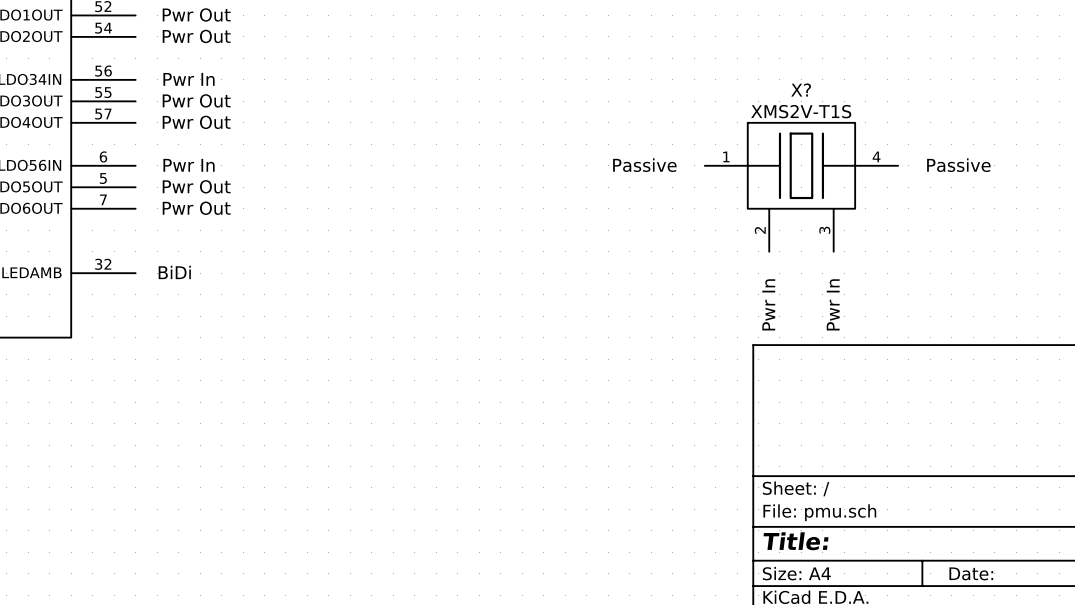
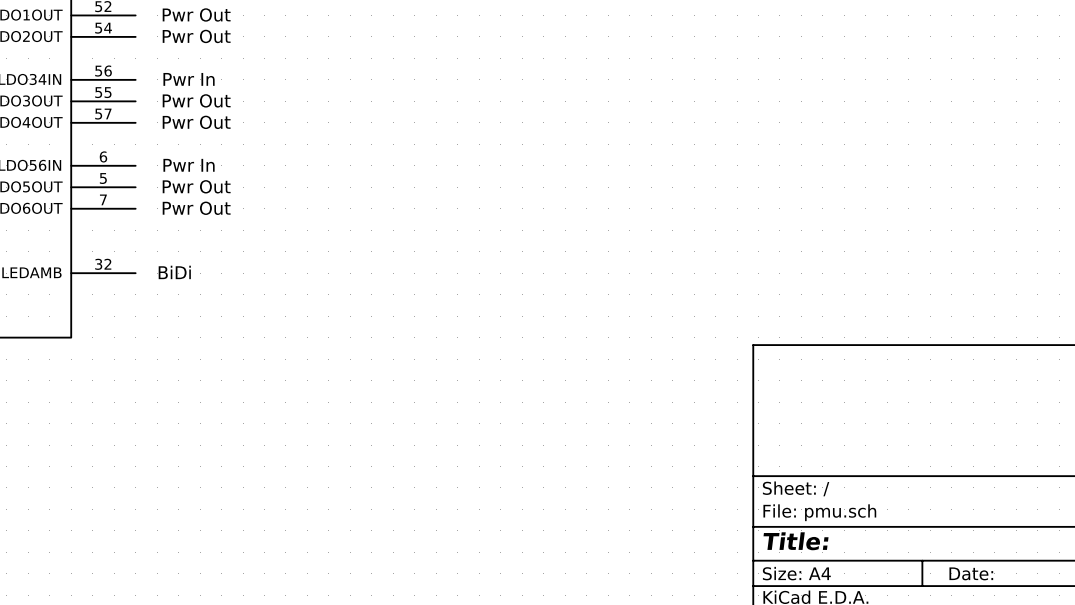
X?: XMS2V-T1S (801, 187) -> none

